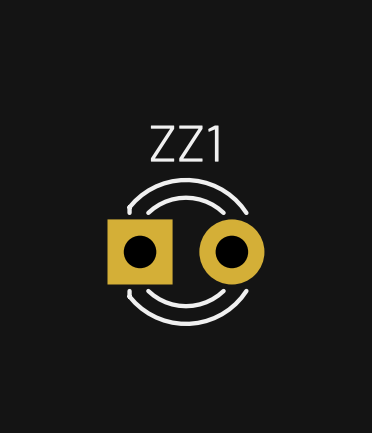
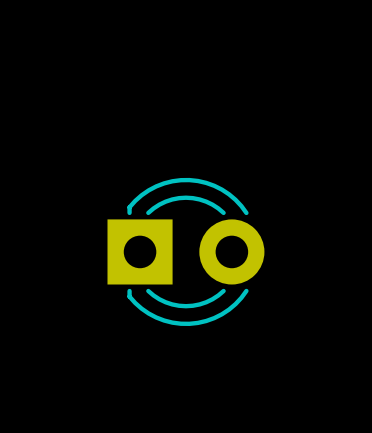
ZZ1 name: ZZ1 (184, 143) -> none

